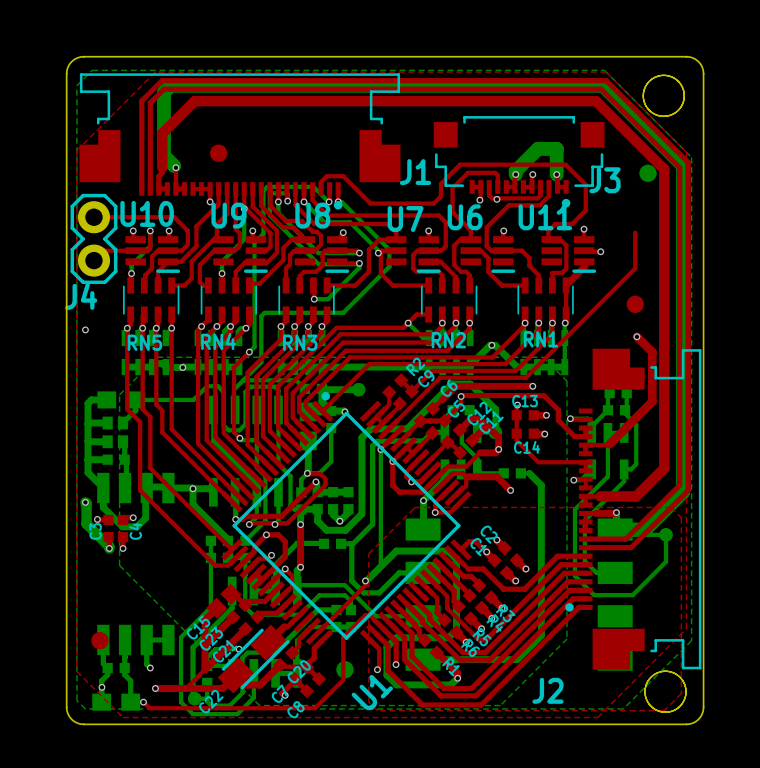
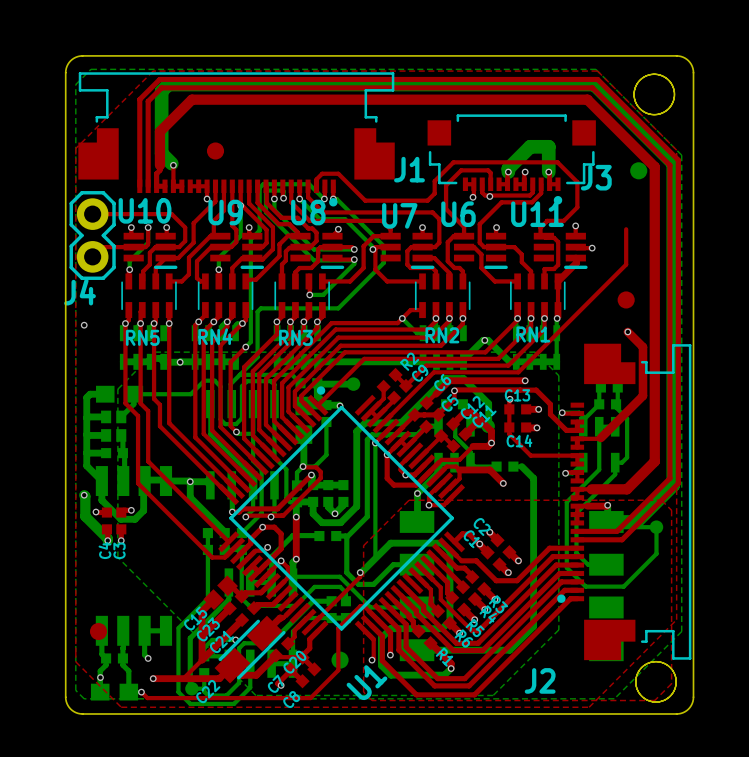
C3 name position: C3 (95, 531) -> C3 (119, 550)
C4 name position: C4 (135, 531) -> C4 (104, 550)

